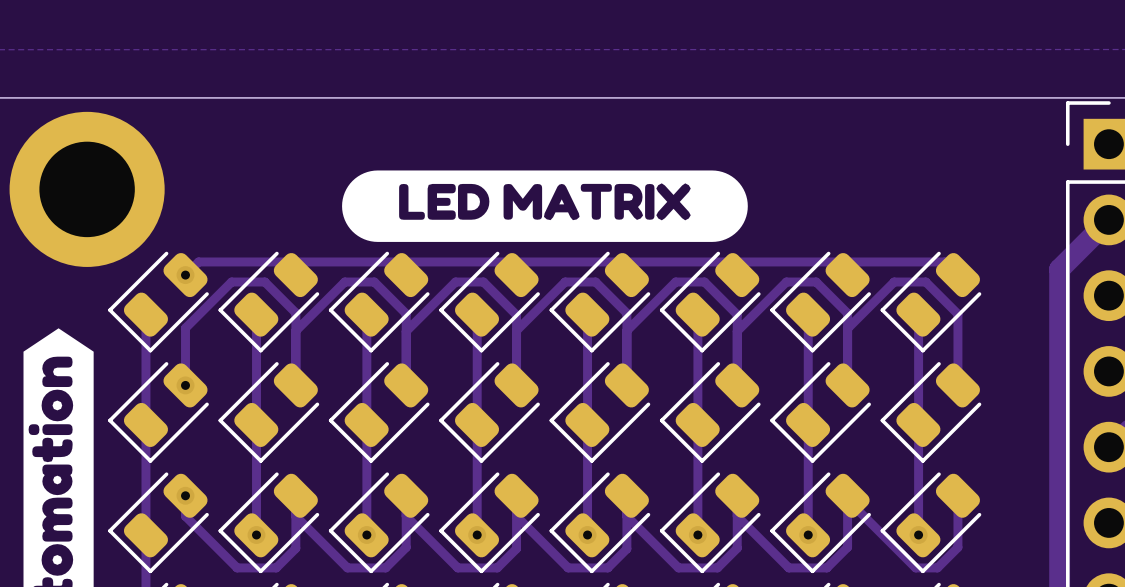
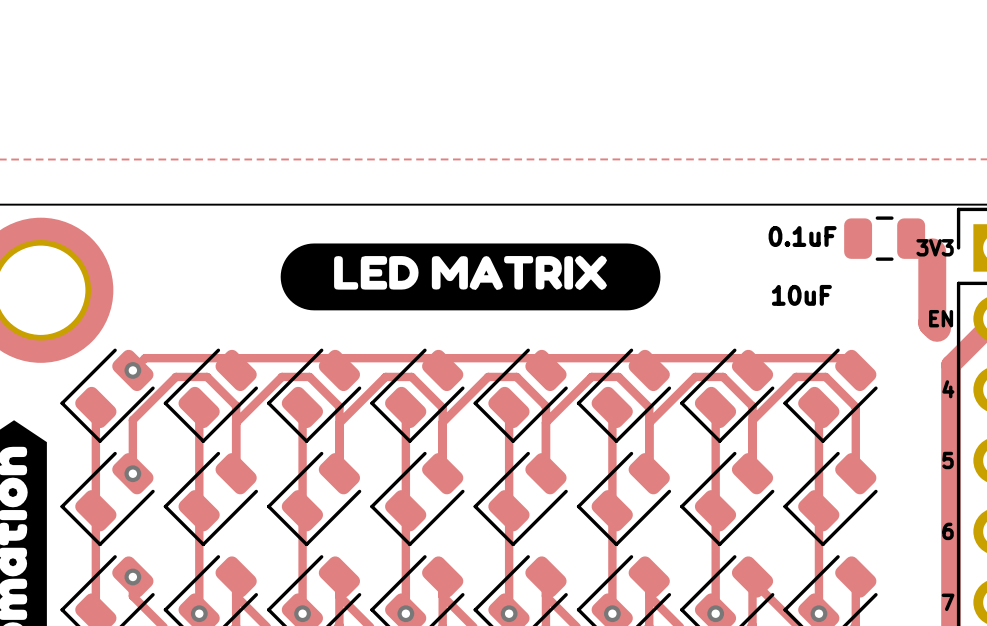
part: none -> 0.1uF (884, 238)
text: none -> 3V3 (935, 247)
track: none -> (932, 252) (932, 323) (937, 327)
text: none -> 10uF (801, 295)
drawing position: (544, 206) -> (470, 276)
text: none -> EN (941, 318)
text: none -> 4 (948, 389)
text: none -> 5 (948, 460)
text: none -> 6 (948, 531)
text: none -> 7 (948, 602)

